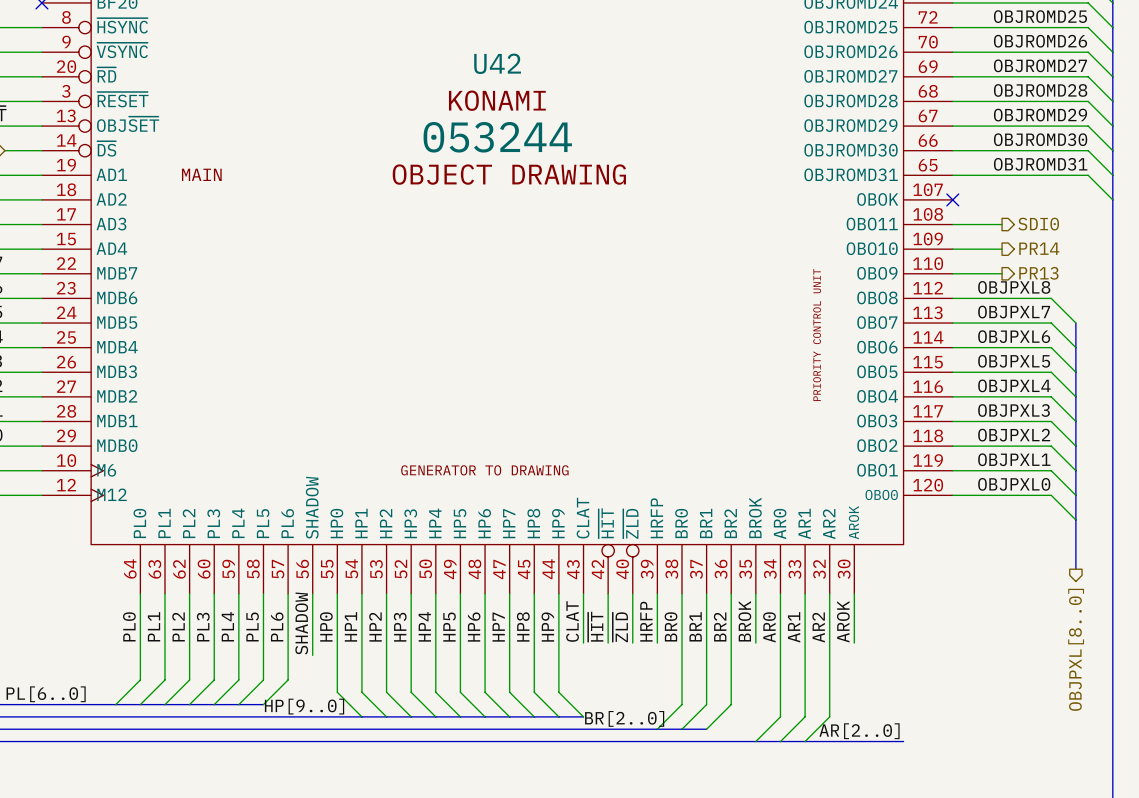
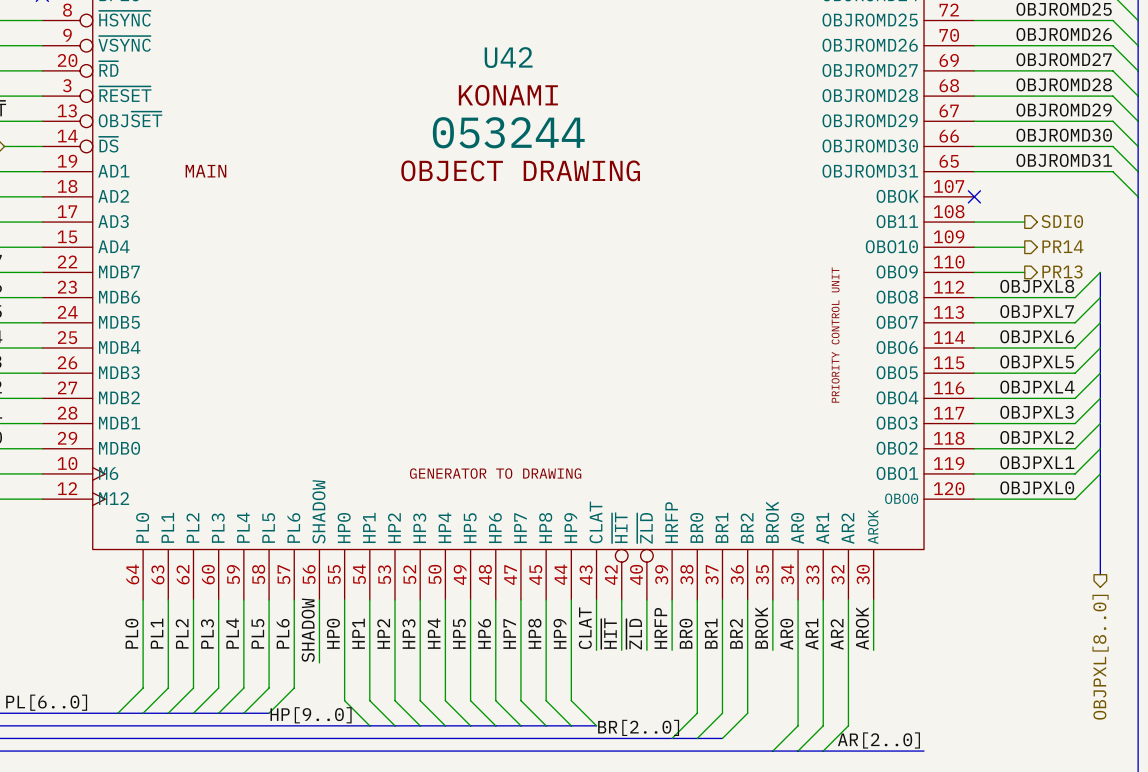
U42 pin name: OBO11 (872, 224) -> OB11 (897, 221)
bus: none -> (1100, 272) (1100, 322)
wire: (1051, 298) (1075, 323) -> (1075, 297) (1100, 272)
wire: (1051, 323) (1075, 347) -> (1075, 322) (1100, 297)
wire: (1051, 347) (1075, 372) -> (1075, 347) (1100, 322)
wire: (1051, 372) (1075, 396) -> (1075, 373) (1100, 347)
wire: (1051, 396) (1075, 421) -> (1075, 398) (1100, 373)
wire: (1051, 421) (1075, 446) -> (1075, 423) (1100, 398)
wire: (1051, 446) (1075, 470) -> (1075, 448) (1100, 423)
wire: (1051, 470) (1075, 495) -> (1075, 473) (1100, 448)
wire: (1051, 495) (1075, 519) -> (1075, 499) (1100, 473)

